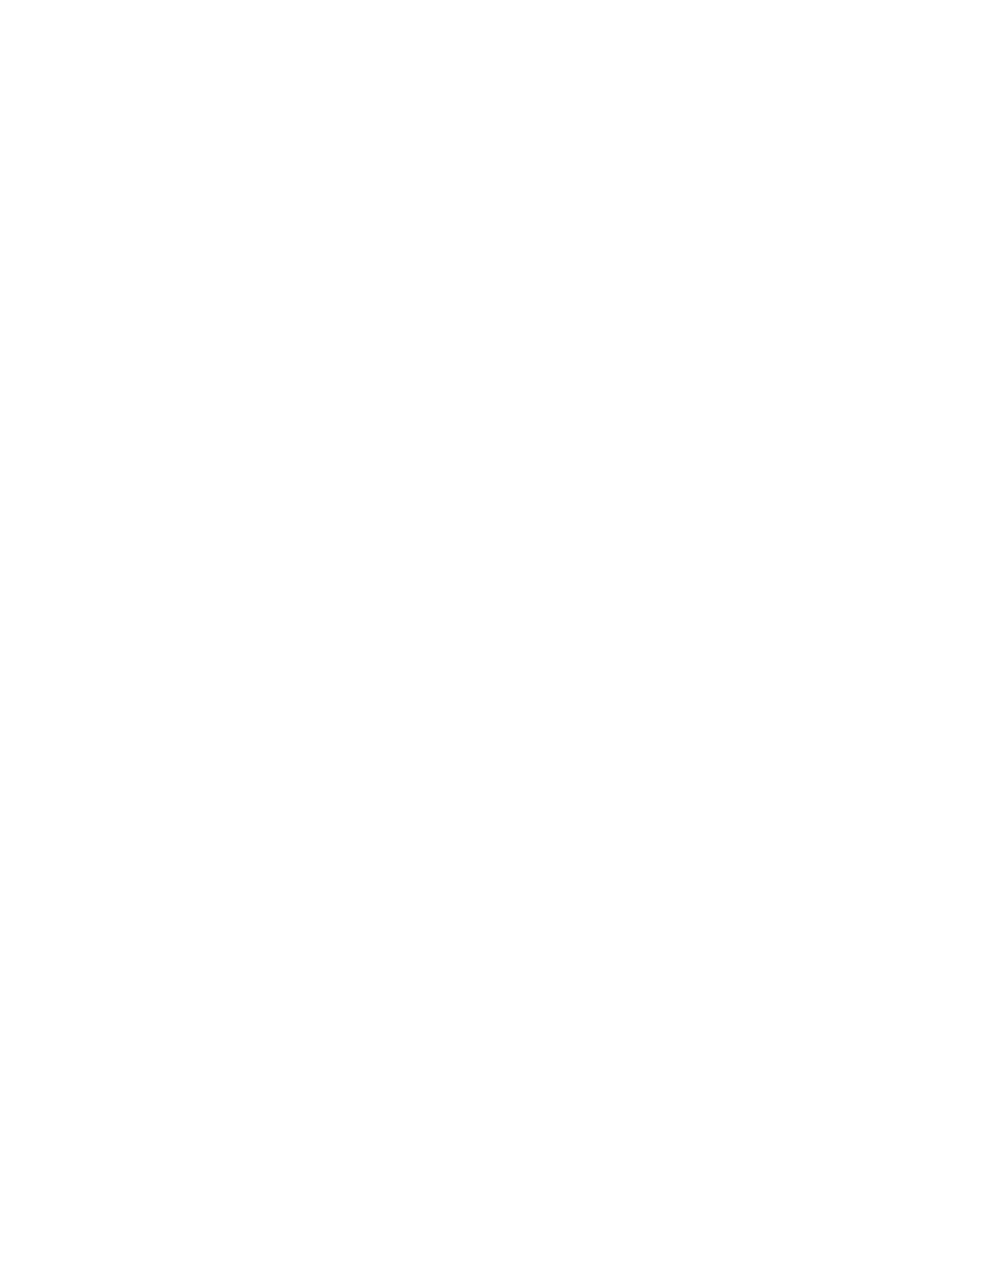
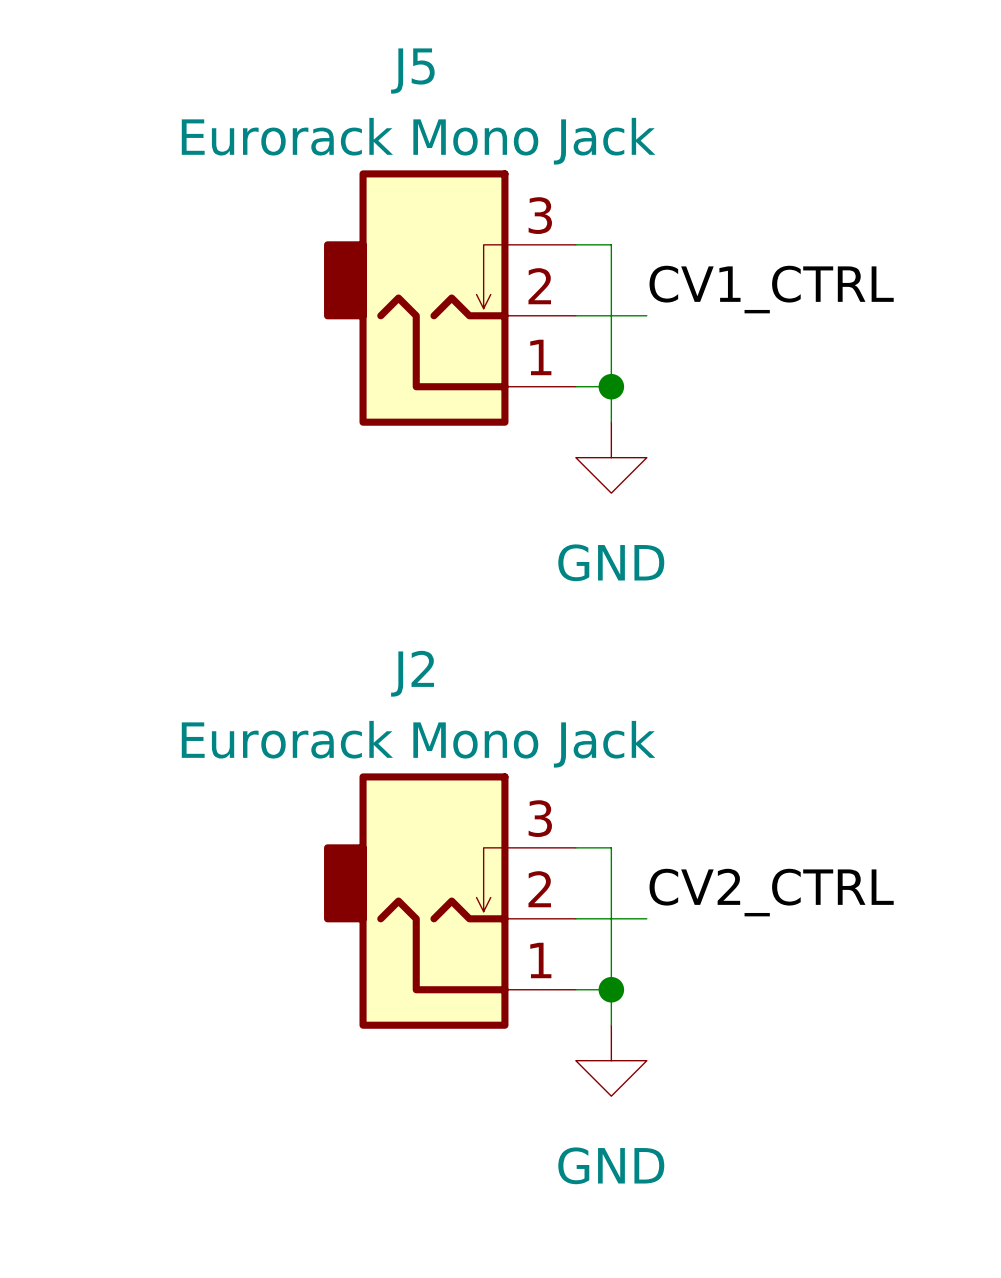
wire: none -> (575, 244) (611, 244) (611, 422)
label: none -> CV1_CTRL (771, 289)
J5: none -> Eurorack Mono Jack (449, 298)
wire: none -> (575, 315) (646, 315)
wire: none -> (575, 386) (611, 386)
junction: none -> (611, 386)
power symbol: none -> GND (611, 457)
wire: none -> (575, 847) (611, 847) (611, 1025)
label: none -> CV2_CTRL (771, 892)
J2: none -> Eurorack Mono Jack (449, 901)
wire: none -> (575, 918) (646, 918)
wire: none -> (575, 989) (611, 989)
junction: none -> (611, 989)
power symbol: none -> GND (611, 1060)

